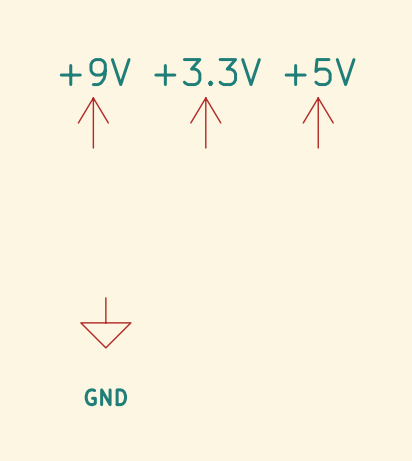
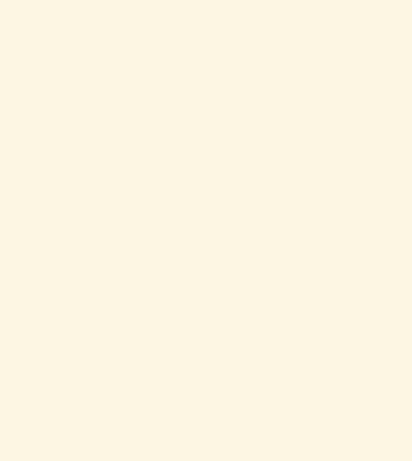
power symbol: +9V (93, 122) -> none
power symbol: +3.3V (205, 122) -> none
power symbol: +5V (318, 122) -> none
power symbol: GND (105, 322) -> none

